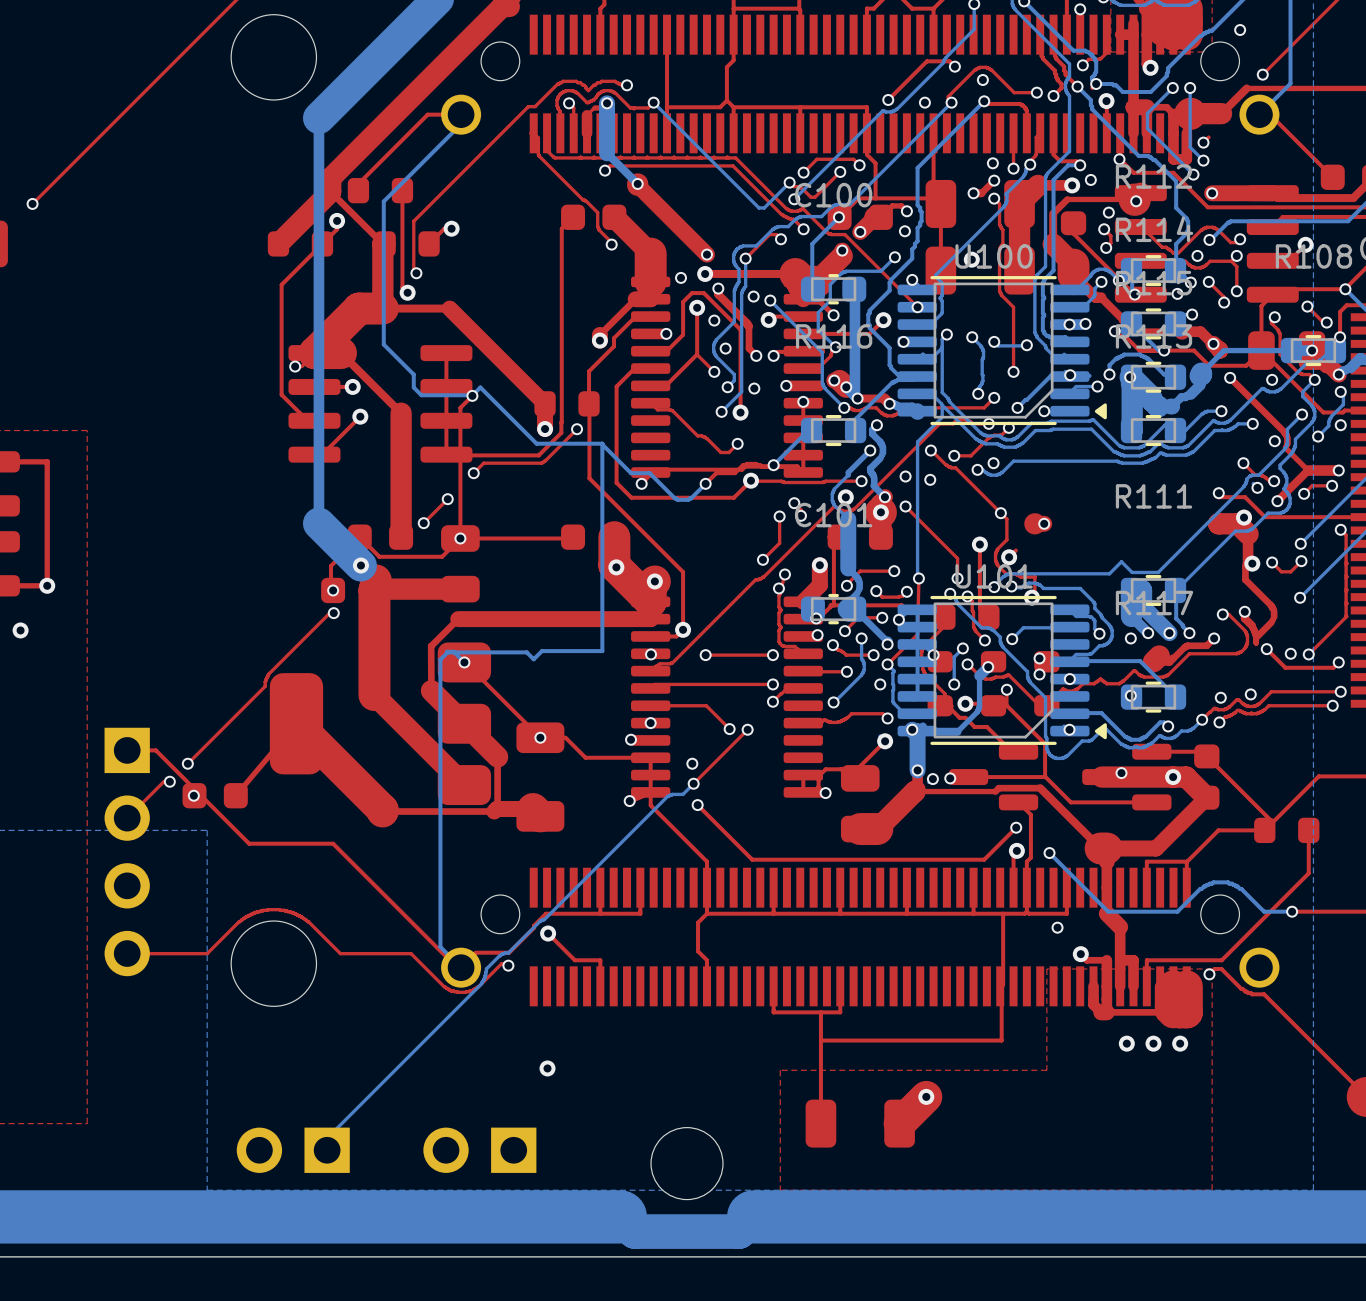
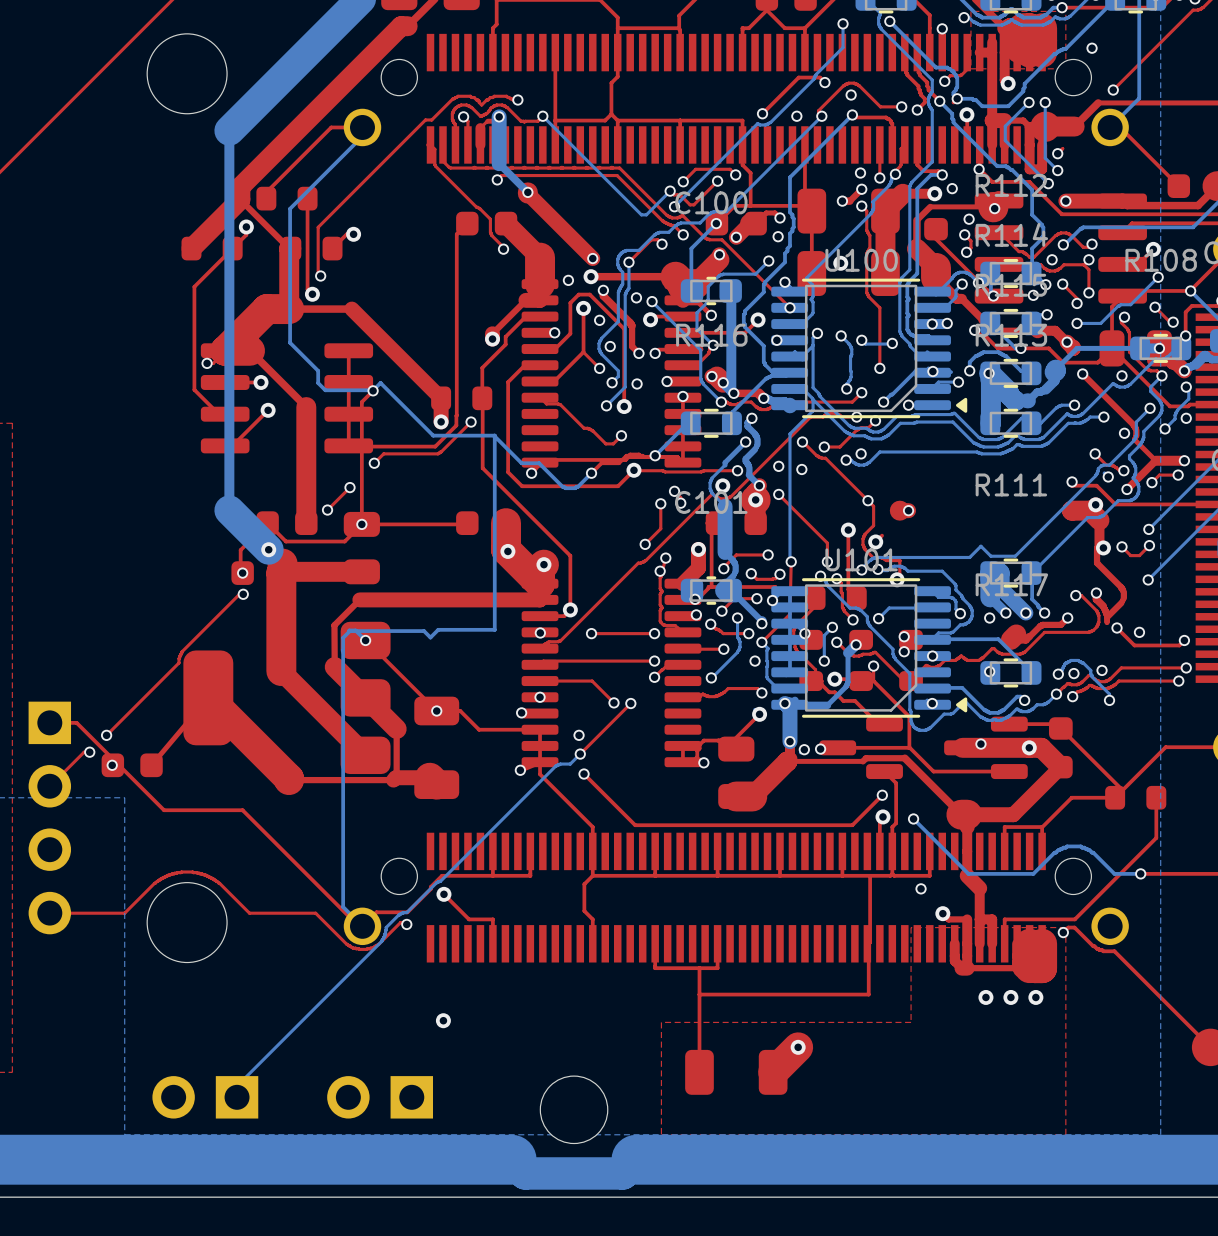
bottom track: none -> (1158, 277) (1130, 304) (1118, 305) (1100, 323) (1077, 323)
via: none -> (1158, 277)
via: none -> (1077, 323)
top track: (1340, 529) (1346, 535) (1346, 616) (1308, 654) -> none
via: (1340, 529) -> none
via: (1308, 654) -> none
bottom track: none -> (1058, 674) (1064, 664) (1070, 660) (1083, 662) (1090, 670) (1092, 676) (1109, 694) (1109, 700)
via: none -> (1058, 674)
via: none -> (1109, 700)

